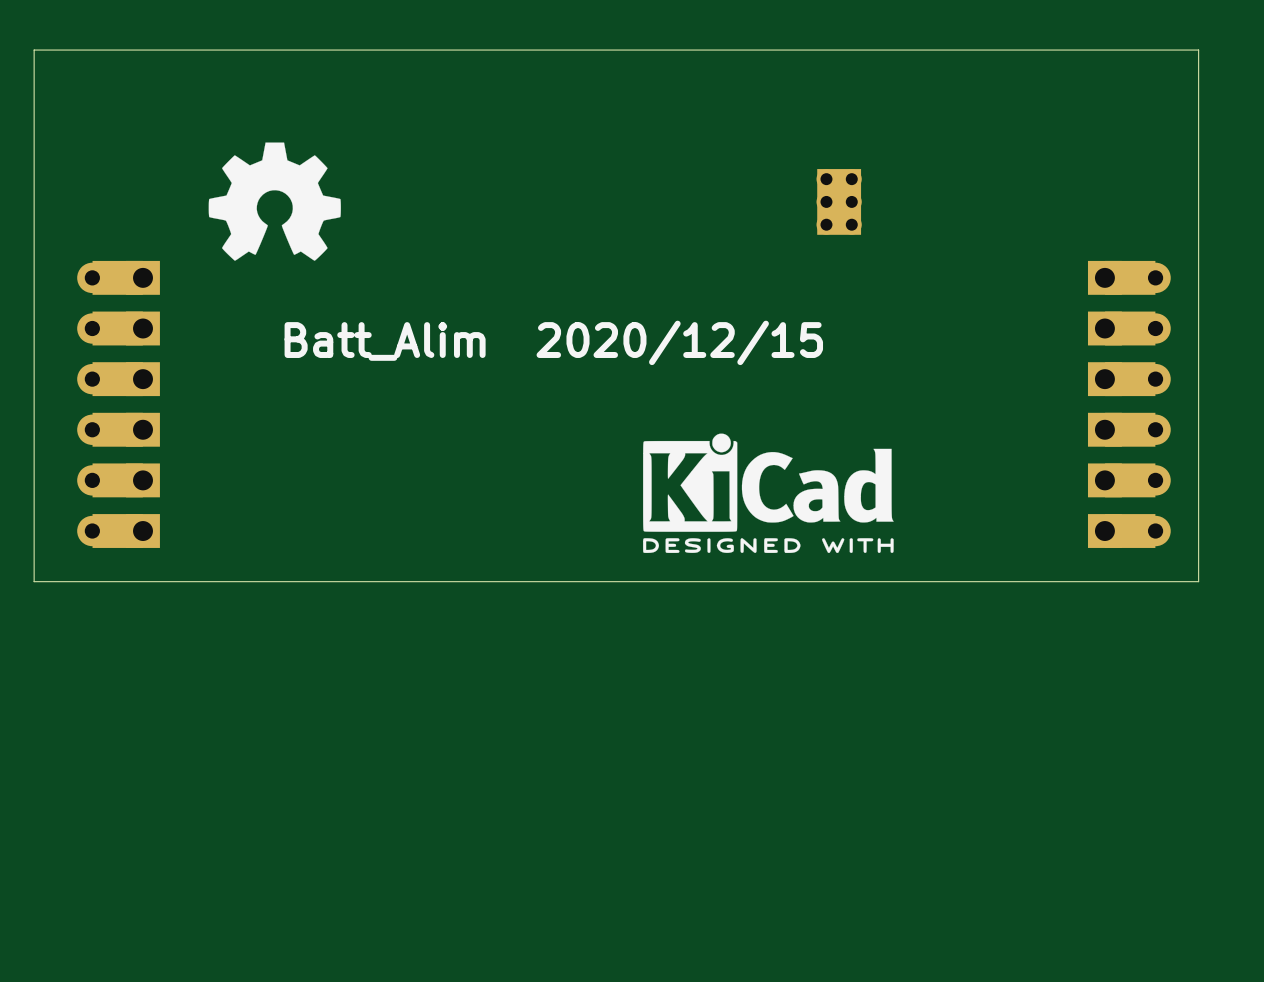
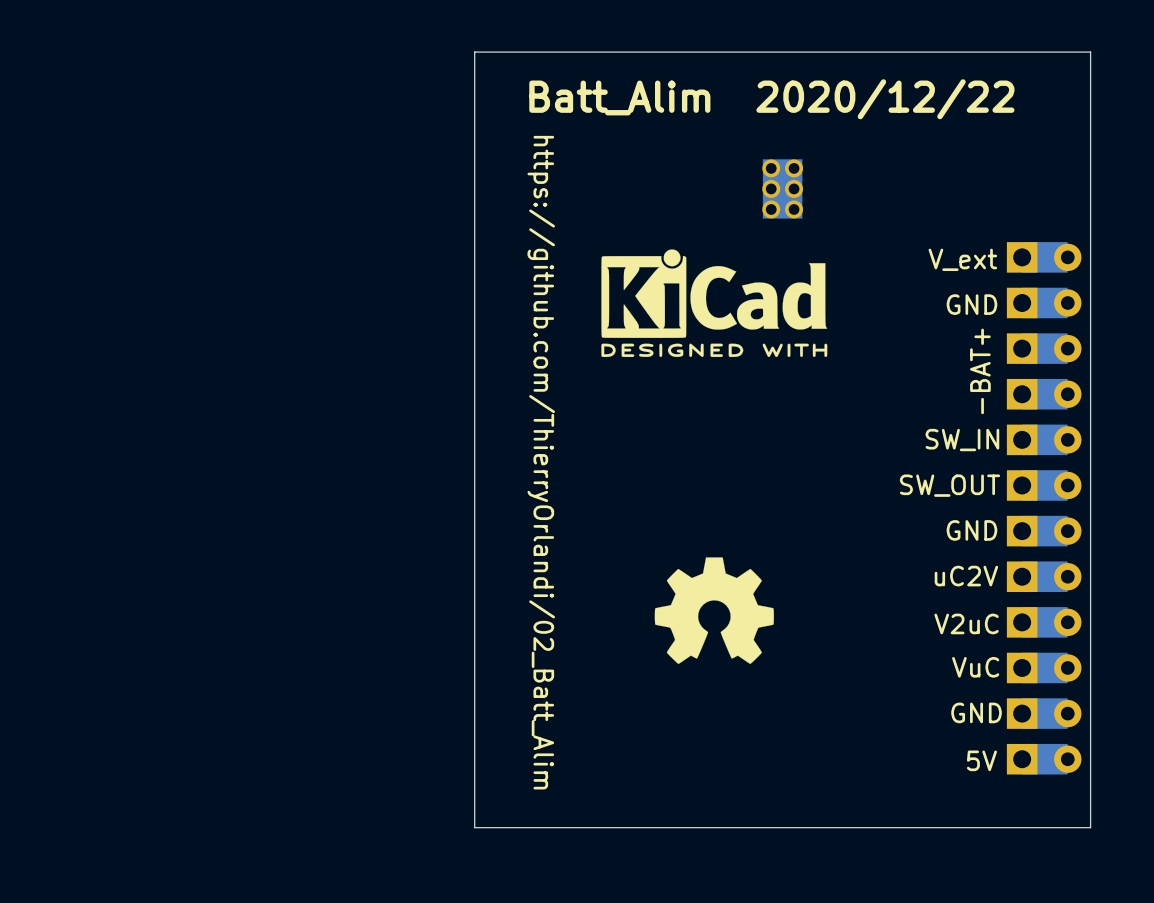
board edge: (1180, 50) (1198, 50) (1198, 581) (34, 581) (34, 50) (497, 50) -> (1090, 52) (1090, 827) (474, 827) (474, 52)
text: none -> Batt_Alim 2020/12/22 (771, 99)
drawing: [208, 142, 341, 261] -> none
part: (118, 277) -> none
text: none -> V_ext (962, 259)
part: (118, 328) -> none
text: none -> GND (971, 304)
text: Batt_Alim 2020/12/15 (553, 342) -> none
part: (118, 379) -> none
text: none -> -BAT+ (980, 371)
part: (118, 429) -> none
part: (118, 480) -> none
text: none -> SW_IN (962, 440)
drawing position: (768, 493) -> (714, 303)
text: none -> https://github.com/ThierryOrlandi/02_Batt_Alim (541, 462)
part: (118, 531) -> none
text: none -> SW_OUT (950, 485)
text: none -> GND (971, 530)
part: none -> (1044, 531)
drawing: none -> [654, 557, 774, 664]
text: none -> uC2V (966, 576)
part: none -> (1044, 576)
part: none -> (1044, 622)
text: none -> V2uC (966, 623)
text: none -> VuC (975, 667)
part: none -> (1044, 667)
text: none -> GND (976, 712)
part: none -> (1044, 713)
part: none -> (1044, 759)
text: none -> 5V (981, 760)

